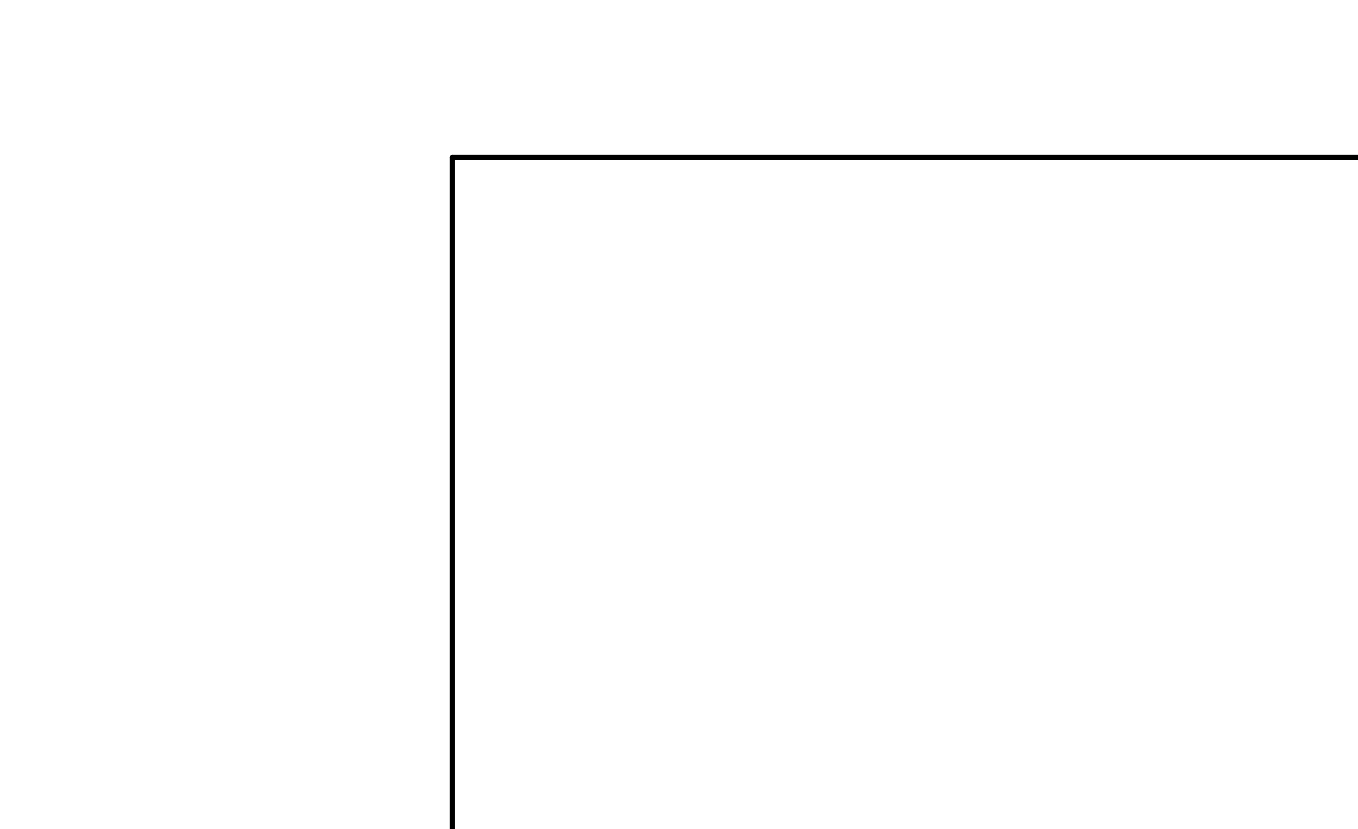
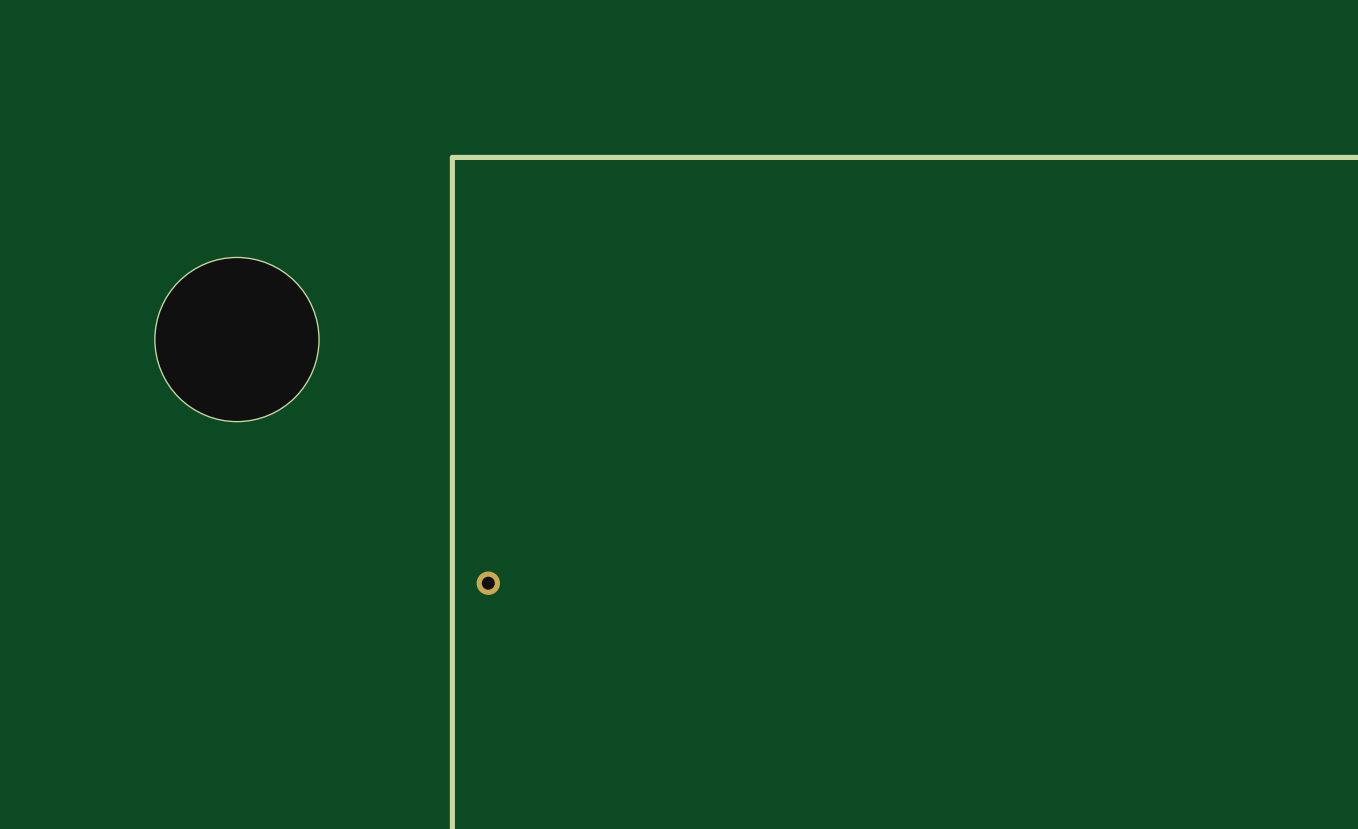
part: none -> (236, 339)
via: none -> (488, 583)

